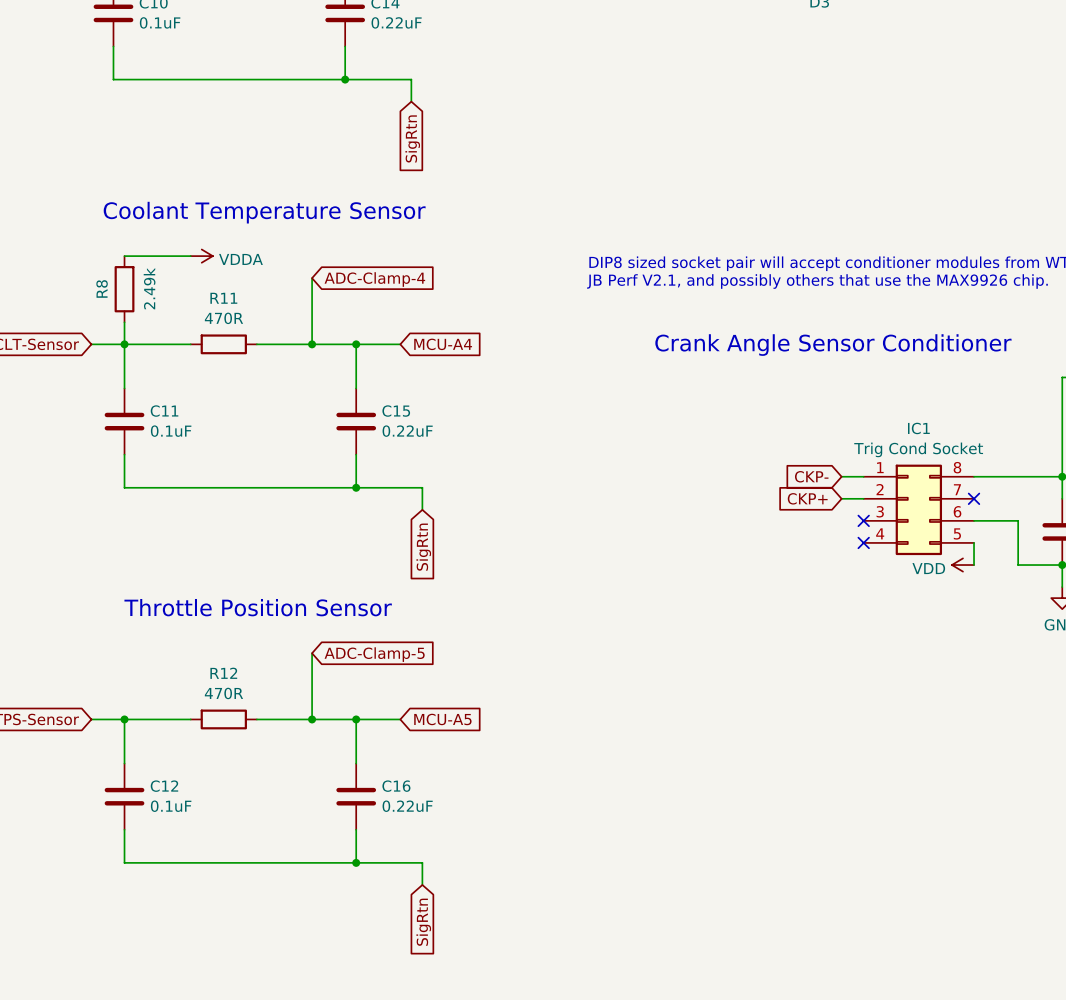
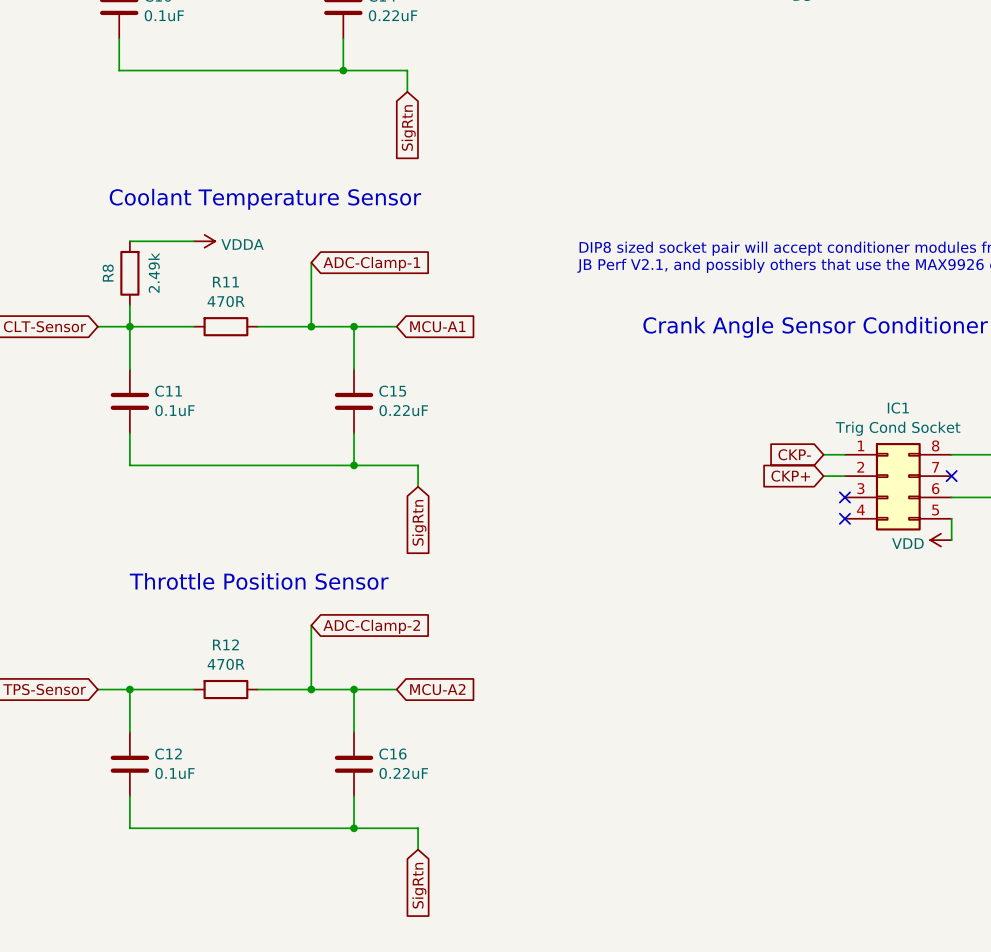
global label: ADC-Clamp-4 (374, 279) -> ADC-Clamp-1 (371, 263)
global label: MCU-A4 (443, 344) -> MCU-A1 (437, 326)
global label: ADC-Clamp-5 (374, 654) -> ADC-Clamp-2 (371, 626)
global label: MCU-A5 (442, 719) -> MCU-A2 (437, 689)

